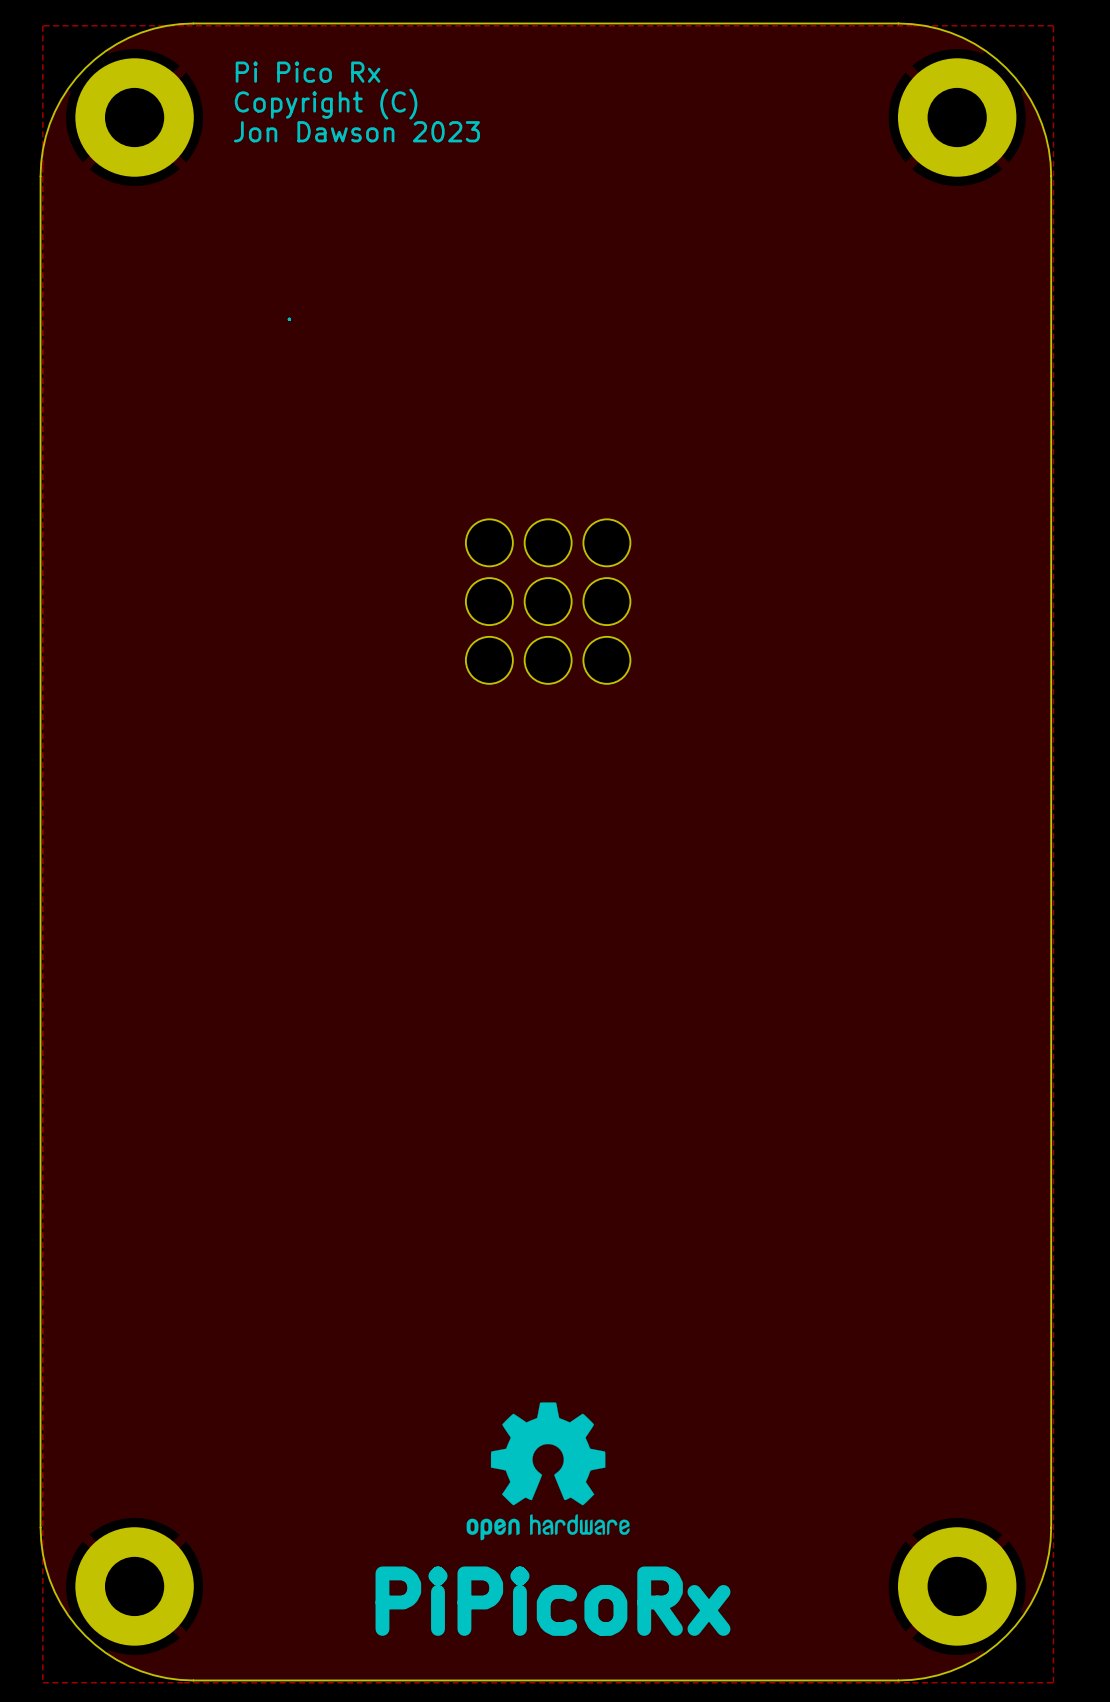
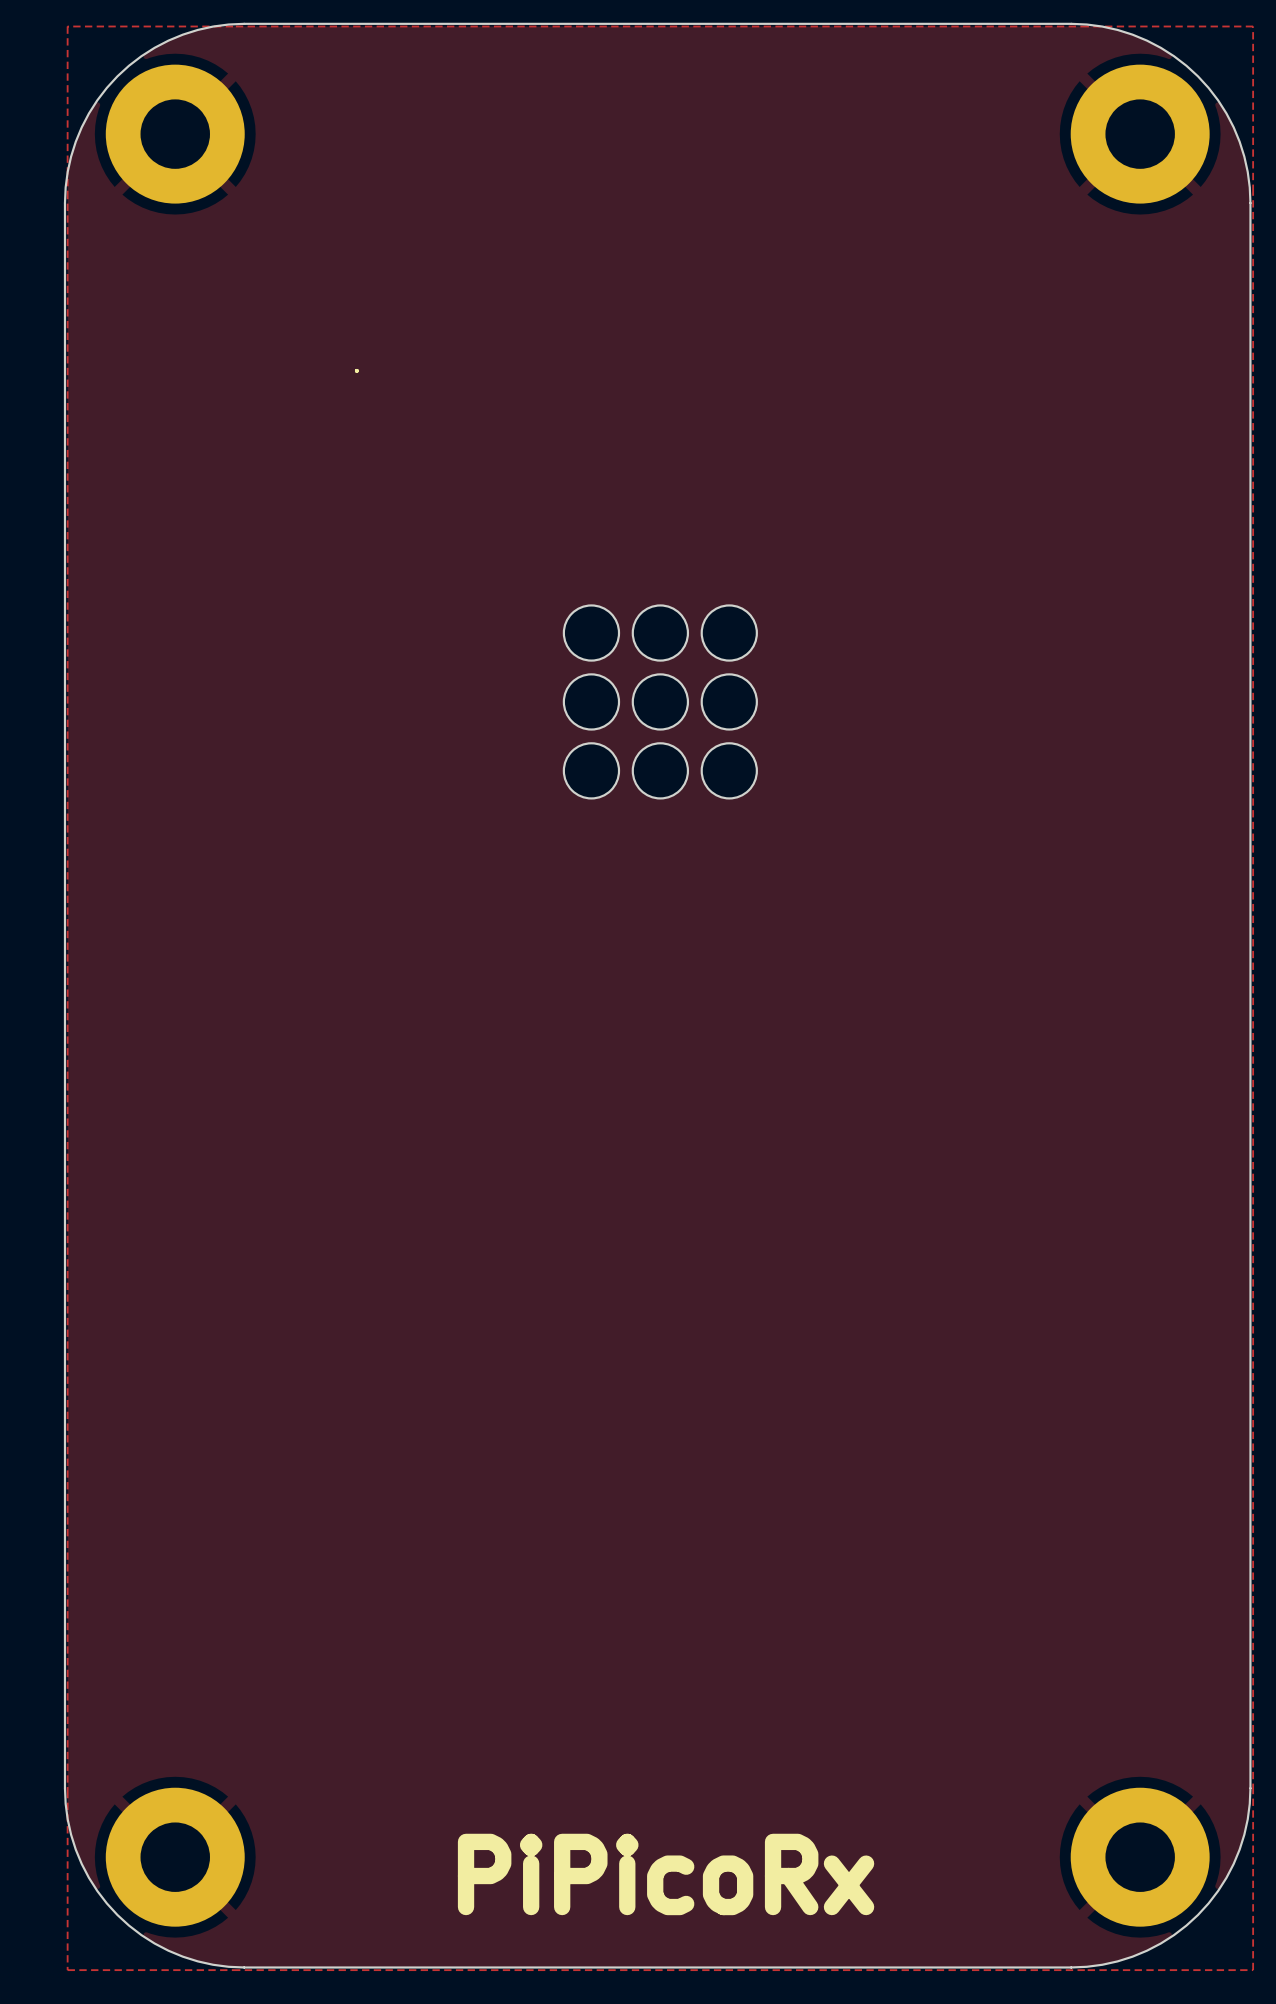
text: Pi Pico Rx (308, 72) -> none
text: Copyright (C) (326, 104) -> none
text: Jon Dawson 2023 (356, 131) -> none
drawing: [466, 1402, 630, 1541] -> none

